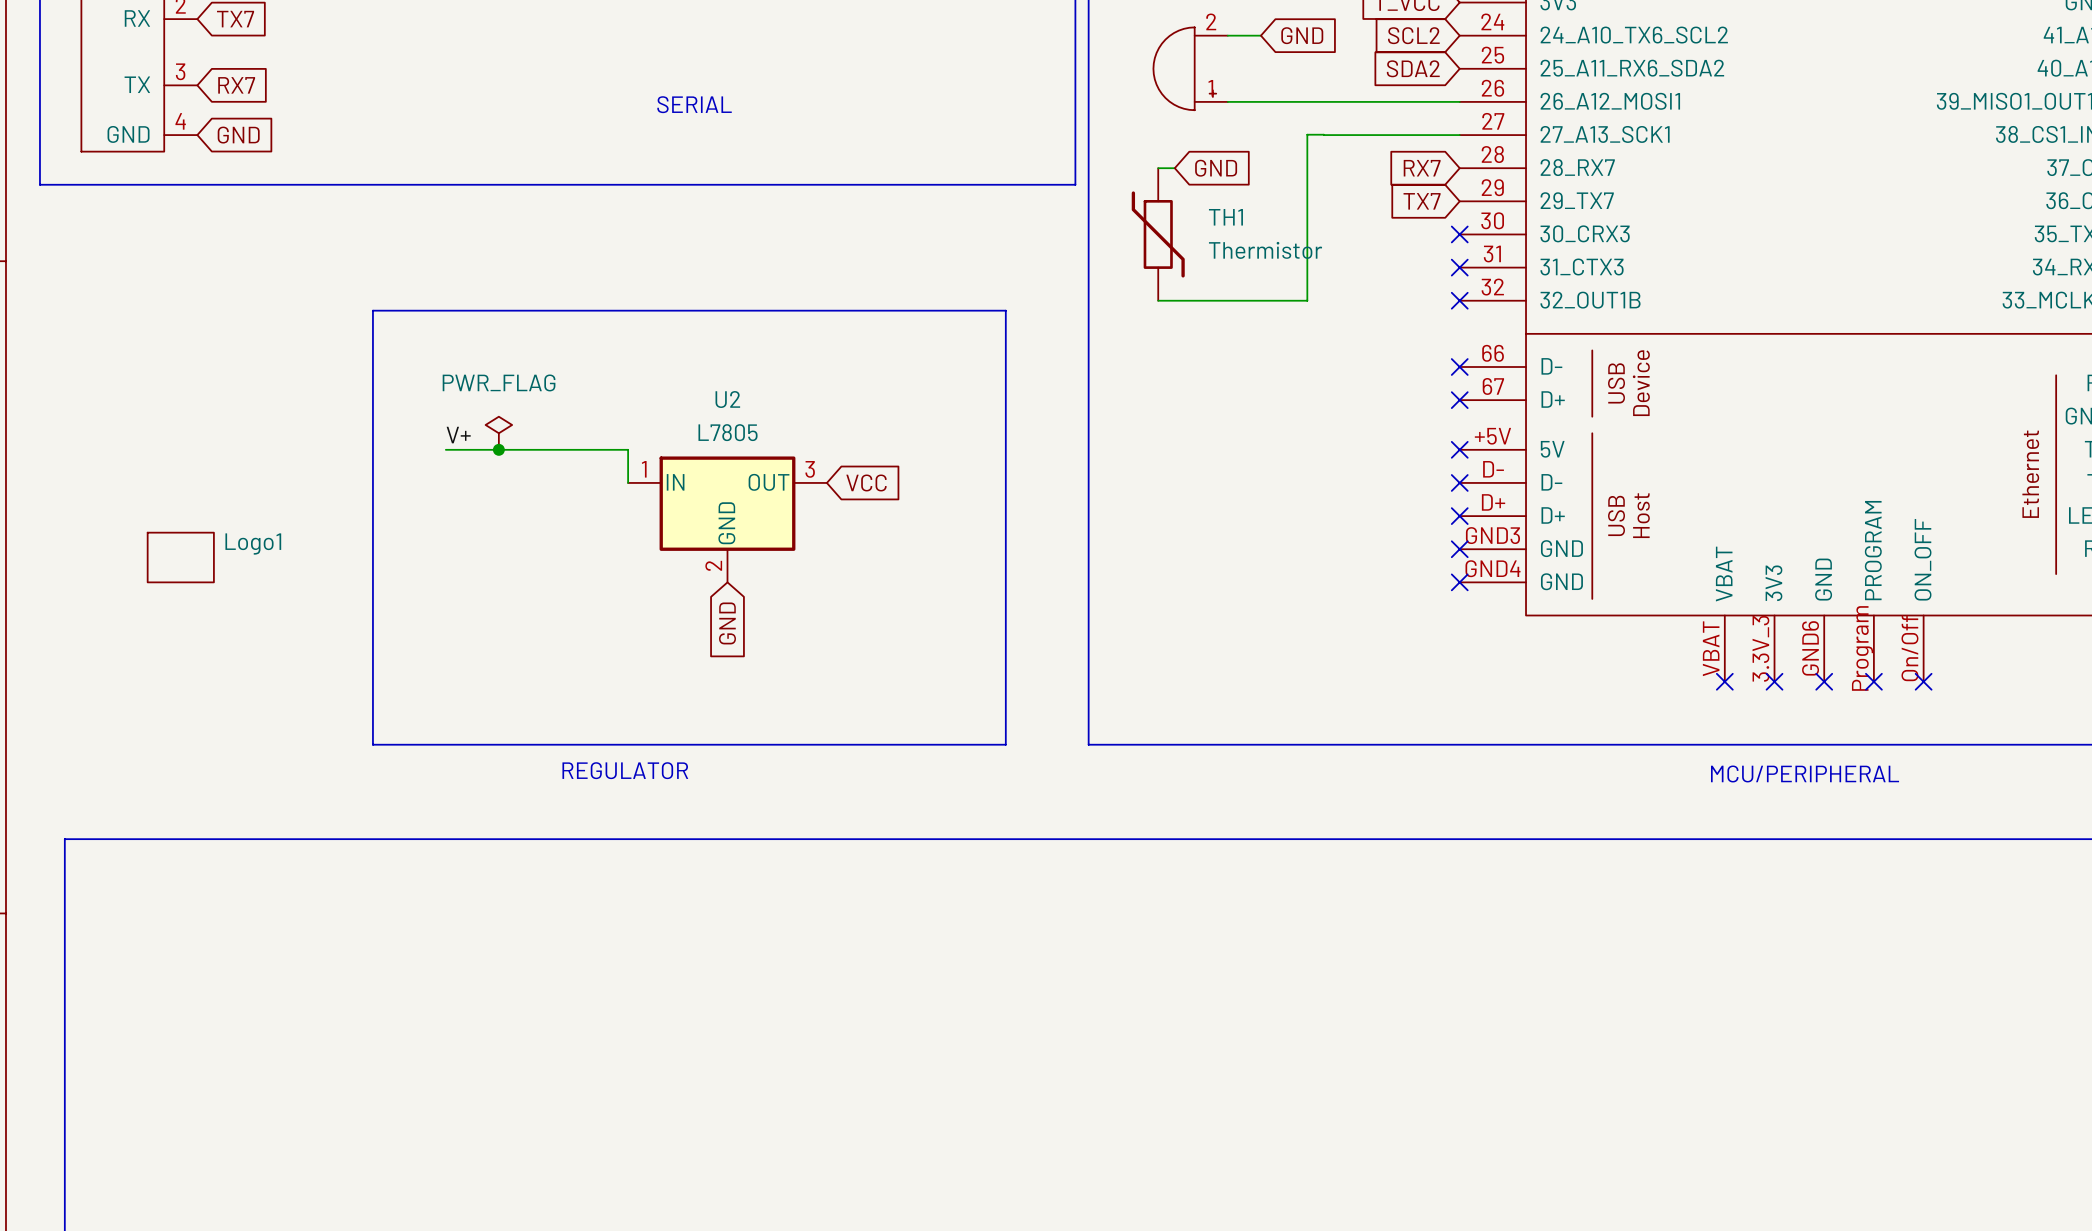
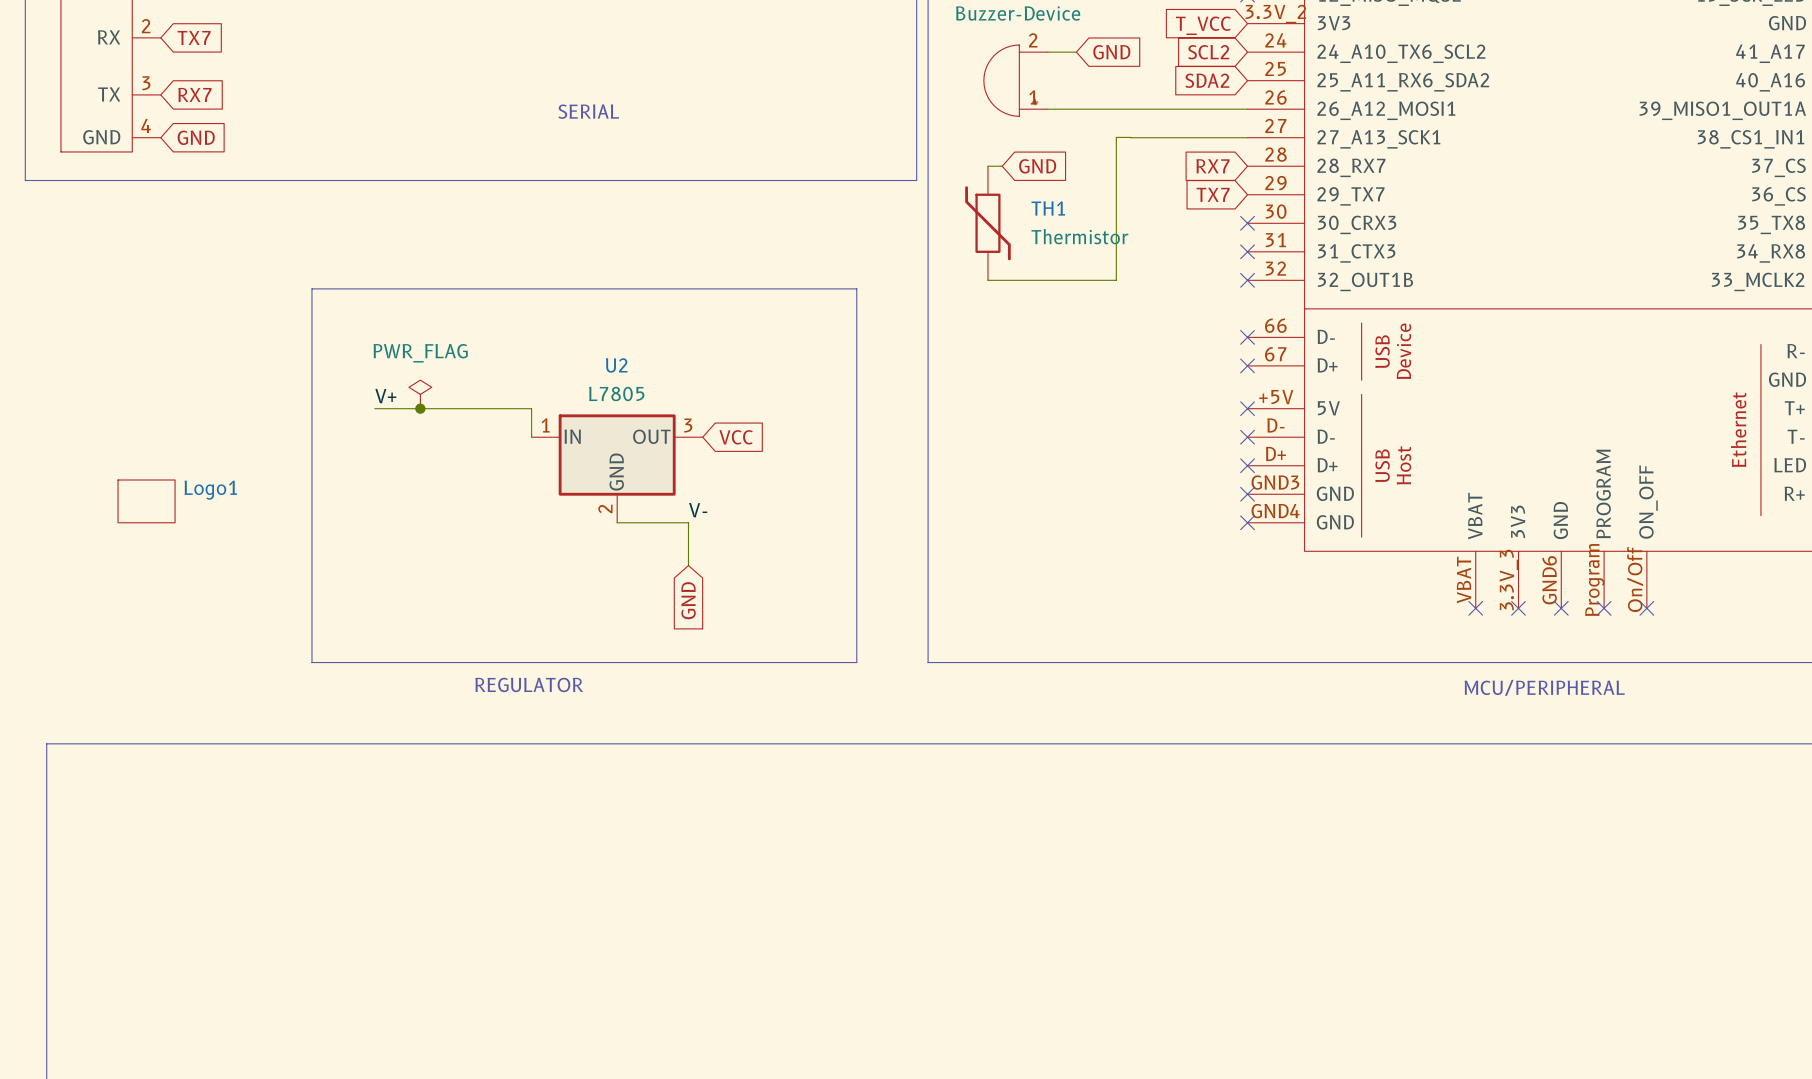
label: none -> V- (698, 510)
wire: none -> (617, 522) (688, 522) (688, 565)
global label position: GND (727, 623) -> GND (688, 600)

